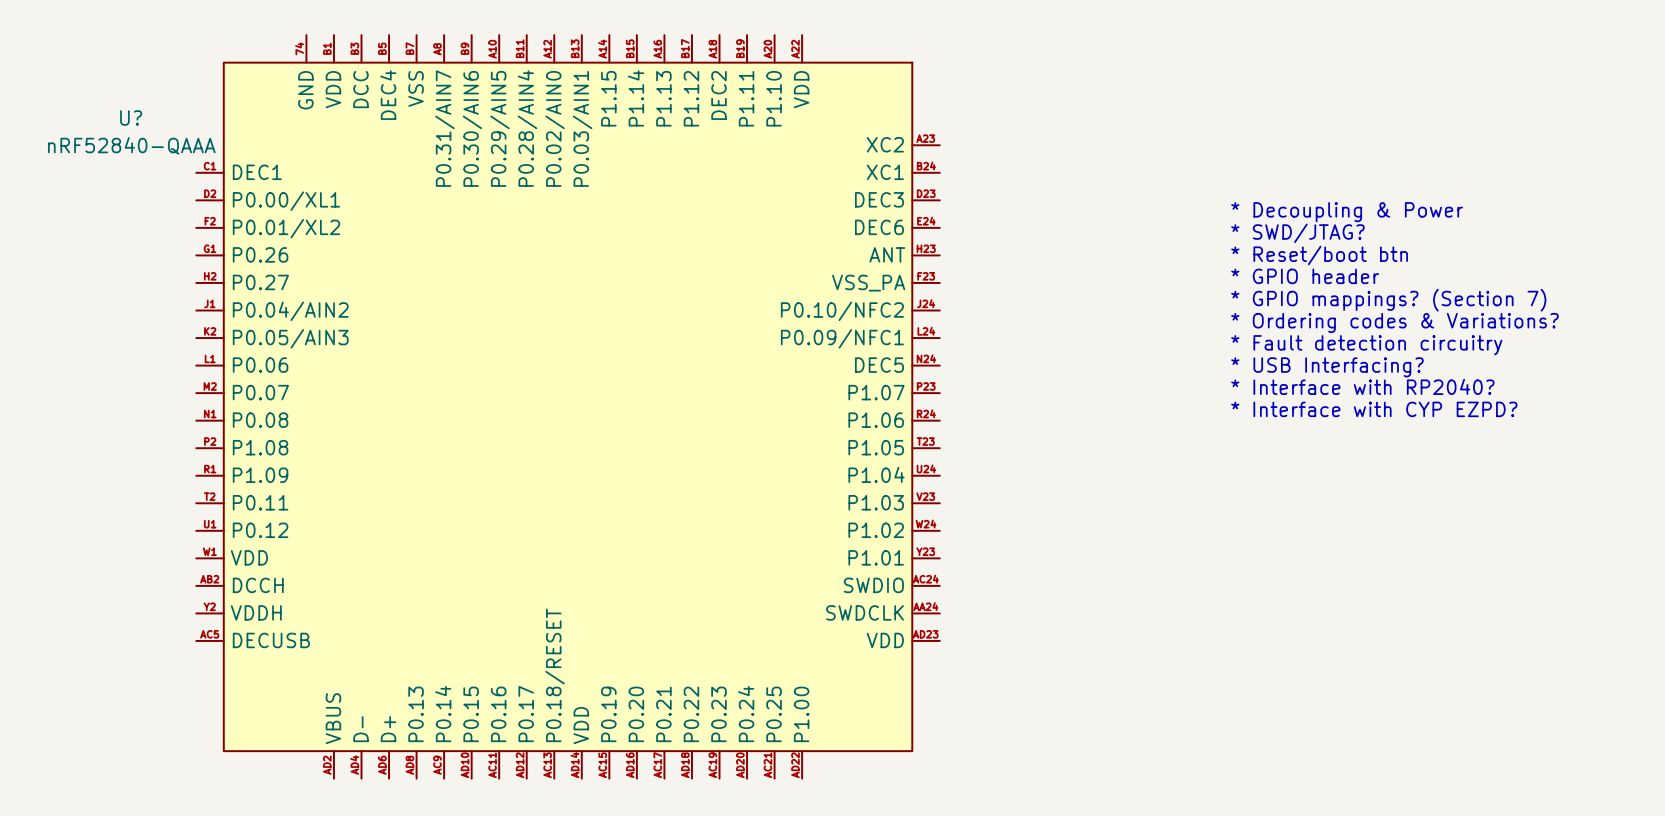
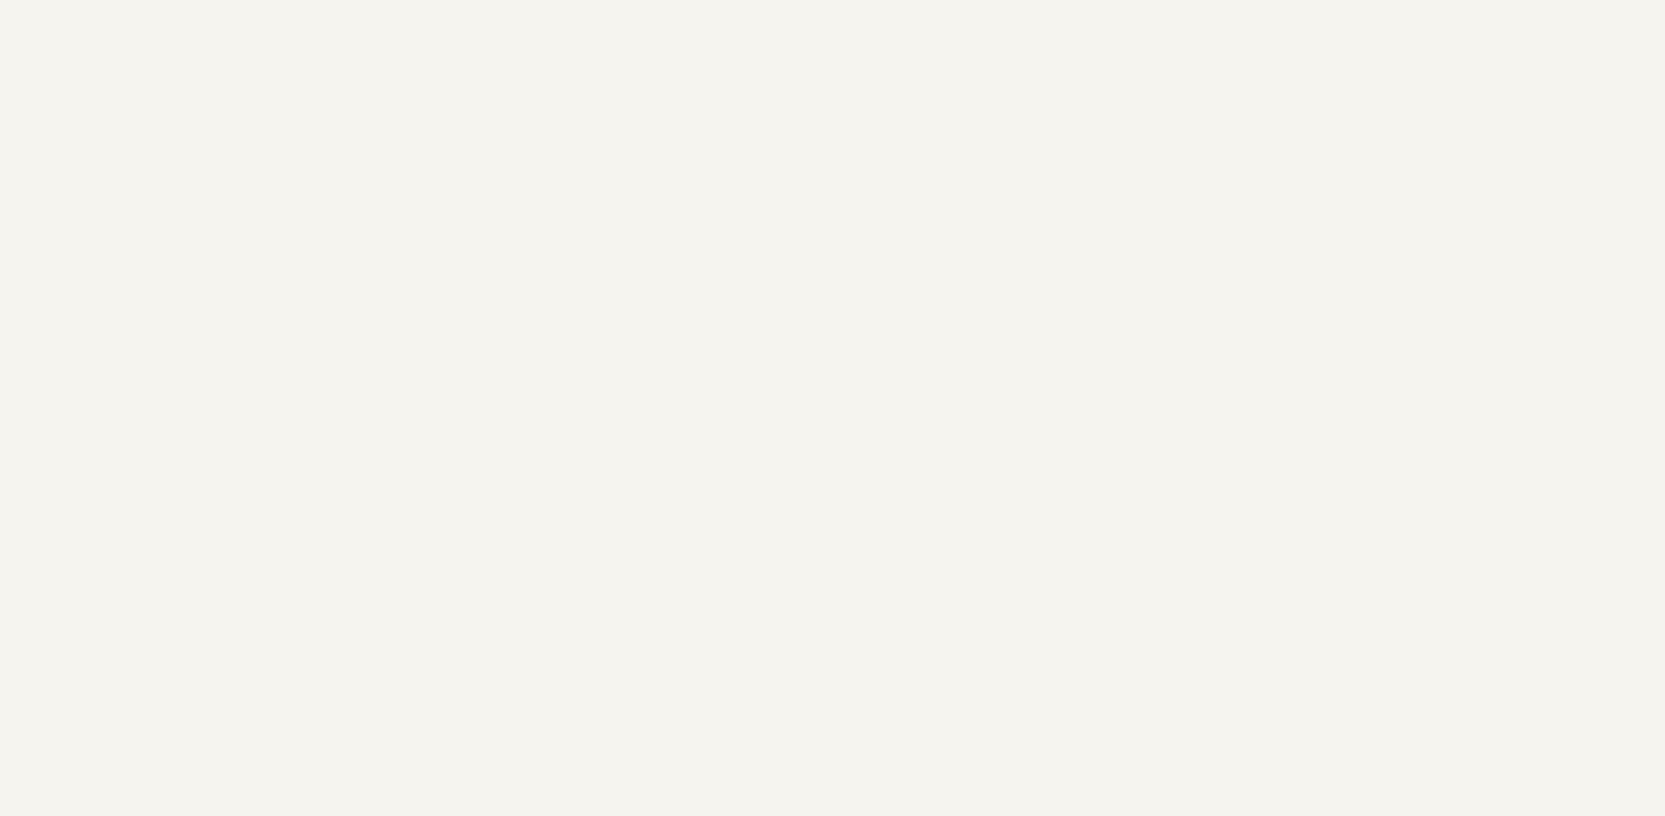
text: * Decoupling & Power (1347, 212) -> none
text: * SWD/JTAG? (1297, 233) -> none
text: * Reset/boot btn (1319, 255) -> none
text: * GPIO header (1305, 276) -> none
text: * GPIO mappings? (Section 7) (1388, 300) -> none
text: * Ordering codes & Variations? (1394, 323) -> none
text: * Fault detection circuitry (1366, 345) -> none
text: * USB Interfacing? (1327, 367) -> none
text: * Interface with RP2040? (1362, 386) -> none
U?: nRF52840-QAAA (568, 406) -> none
text: * Interface with CYP EZPD? (1374, 409) -> none

